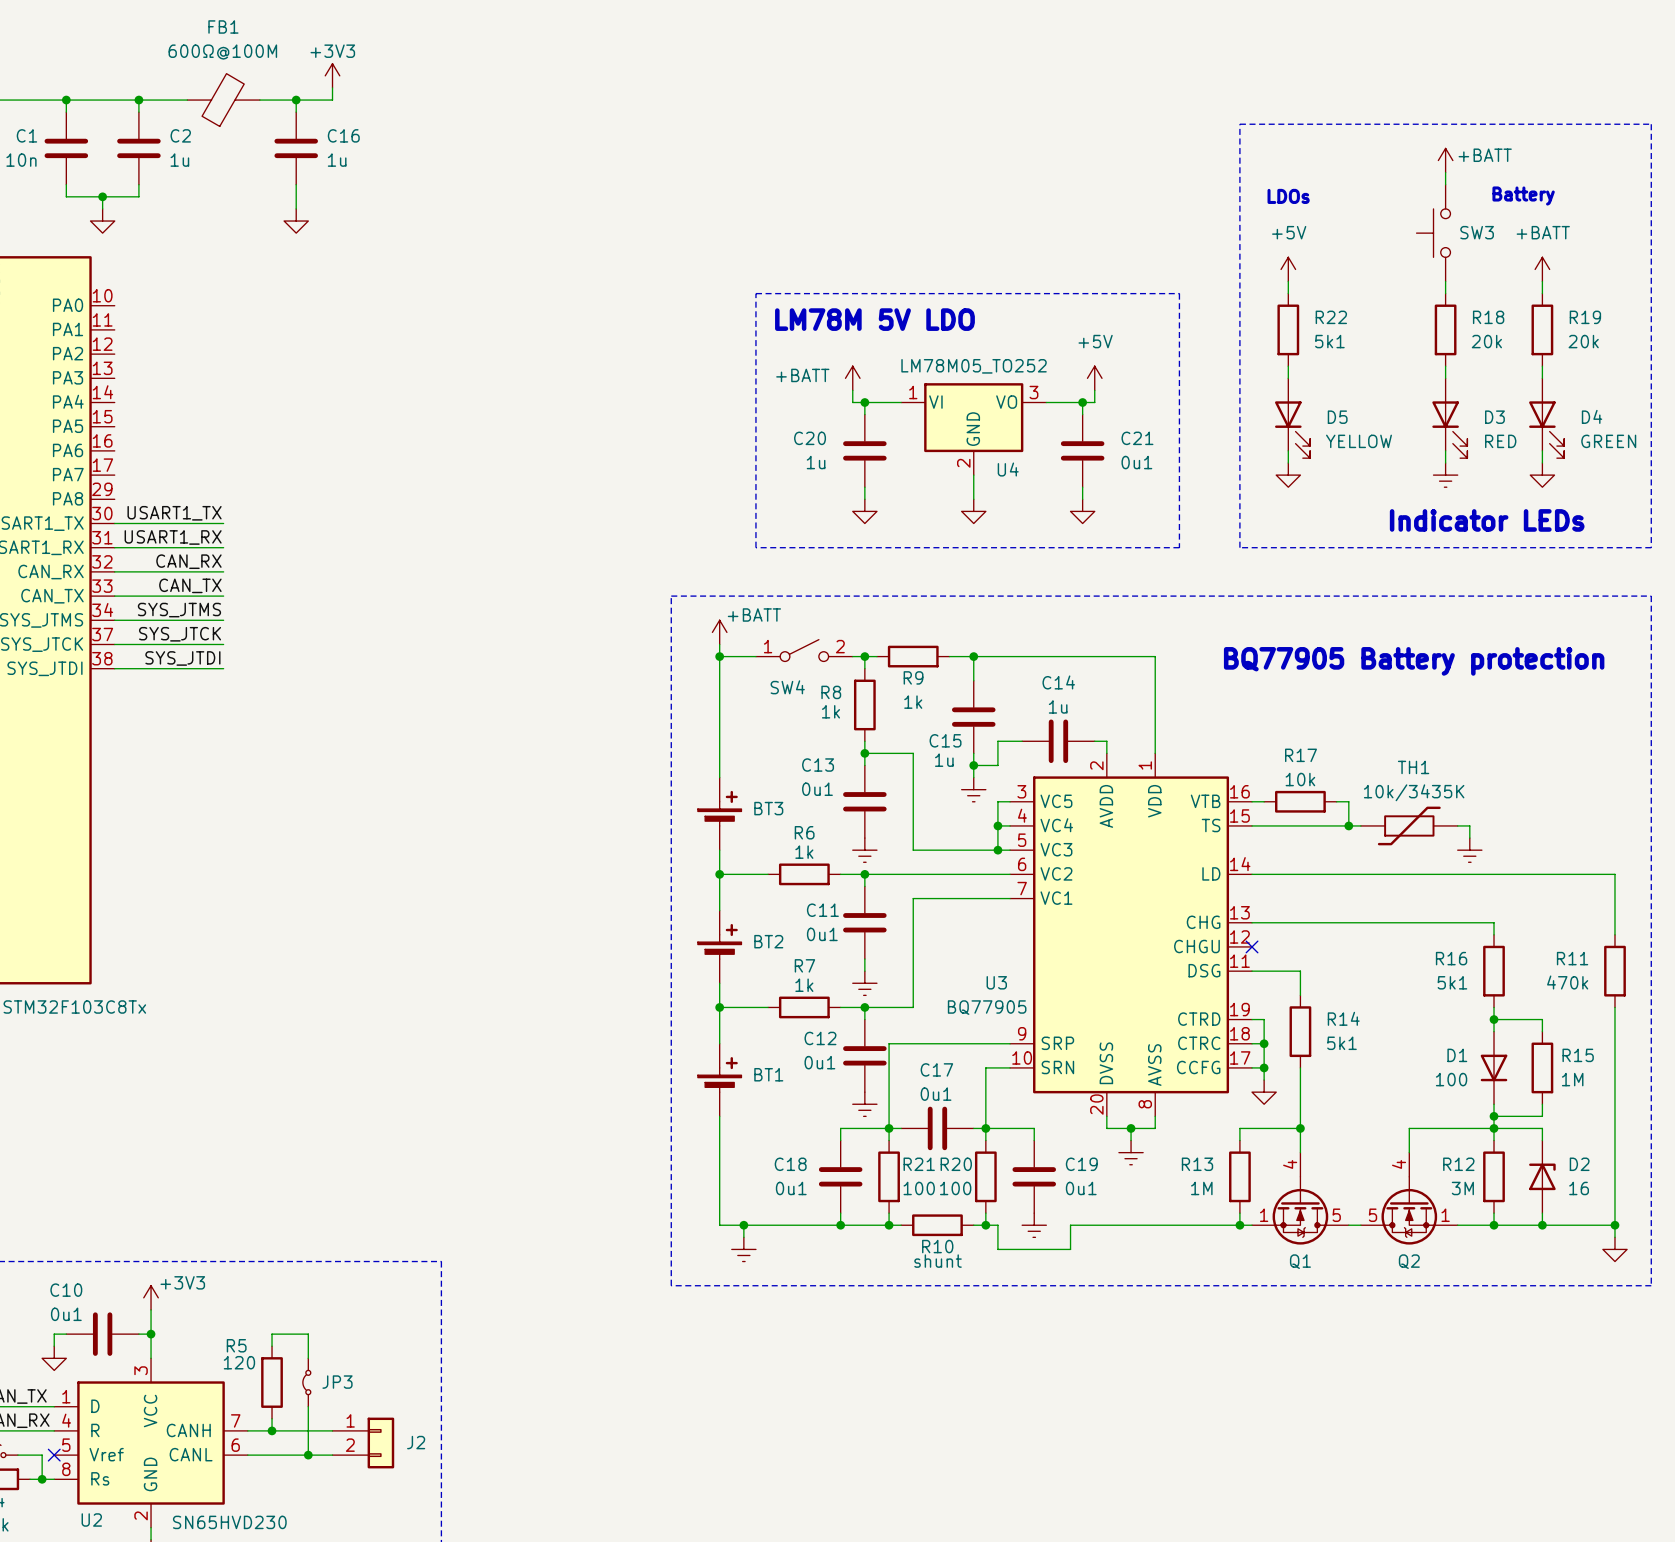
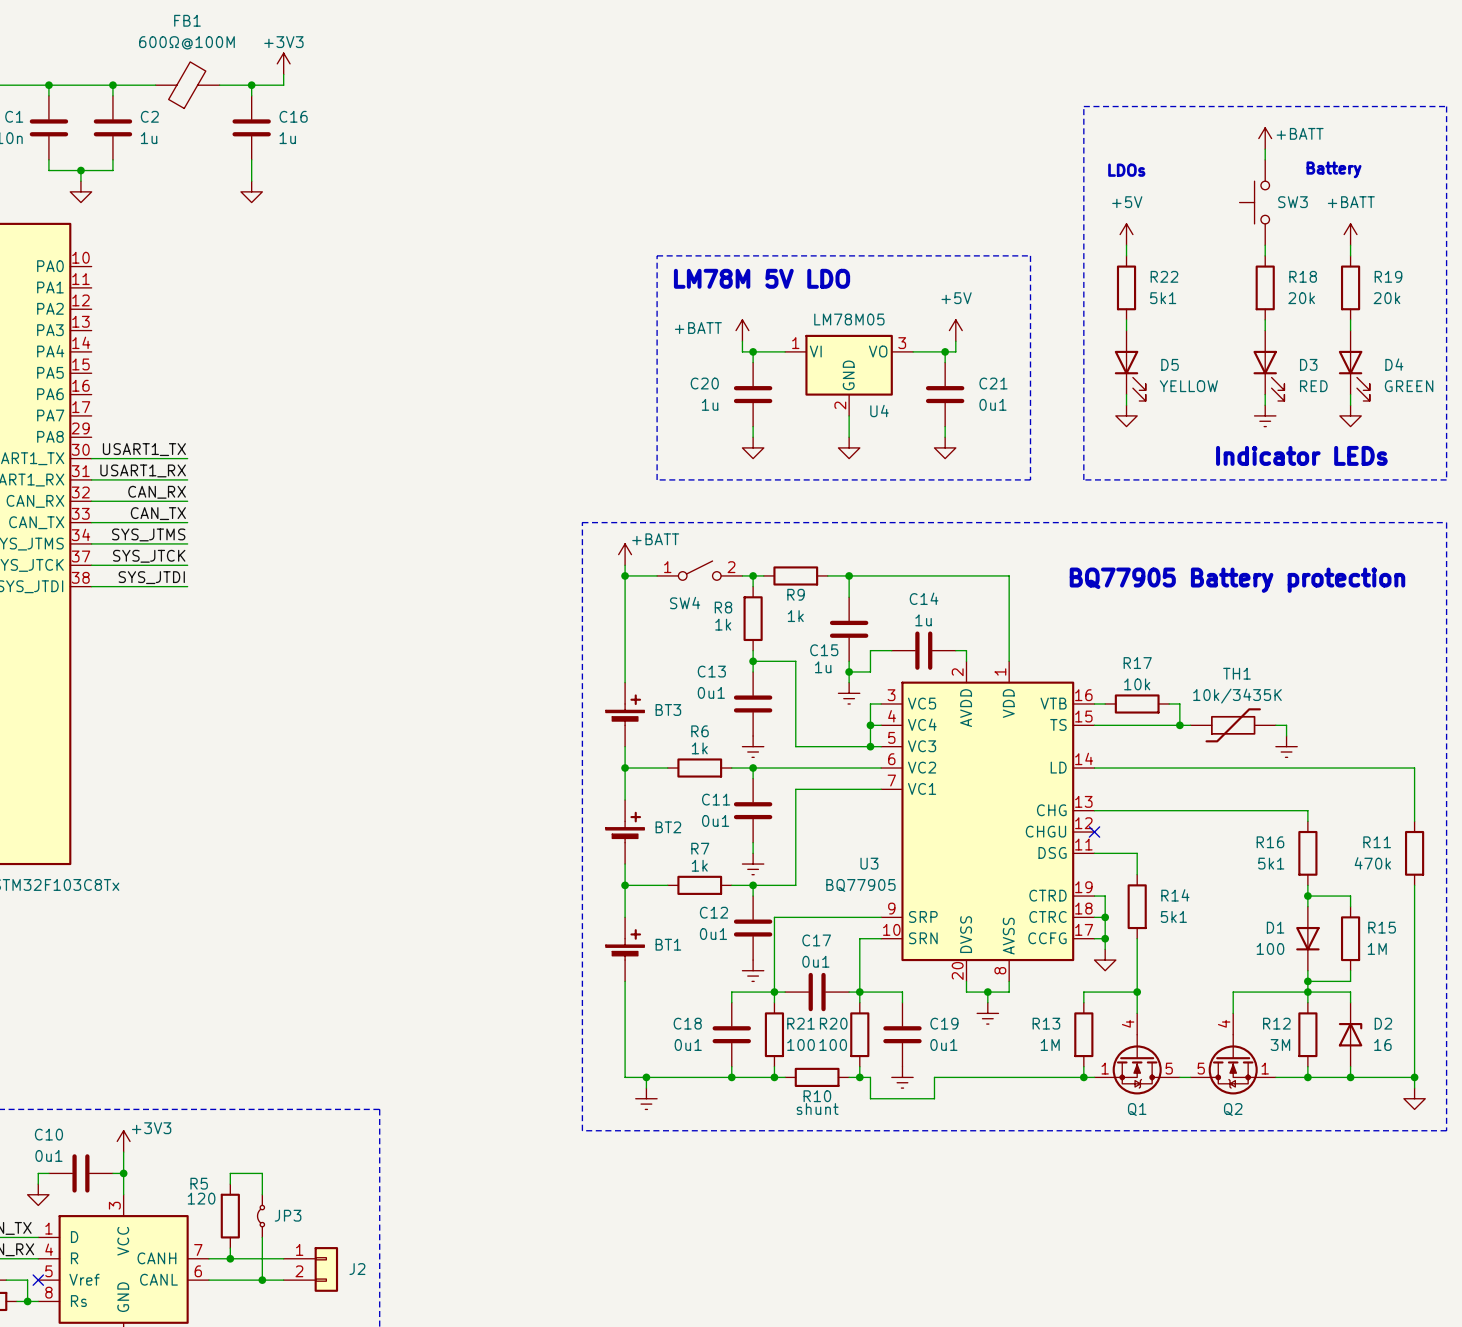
U4 value: LM78M05_TO252 (974, 366) -> LM78M05 (849, 319)

